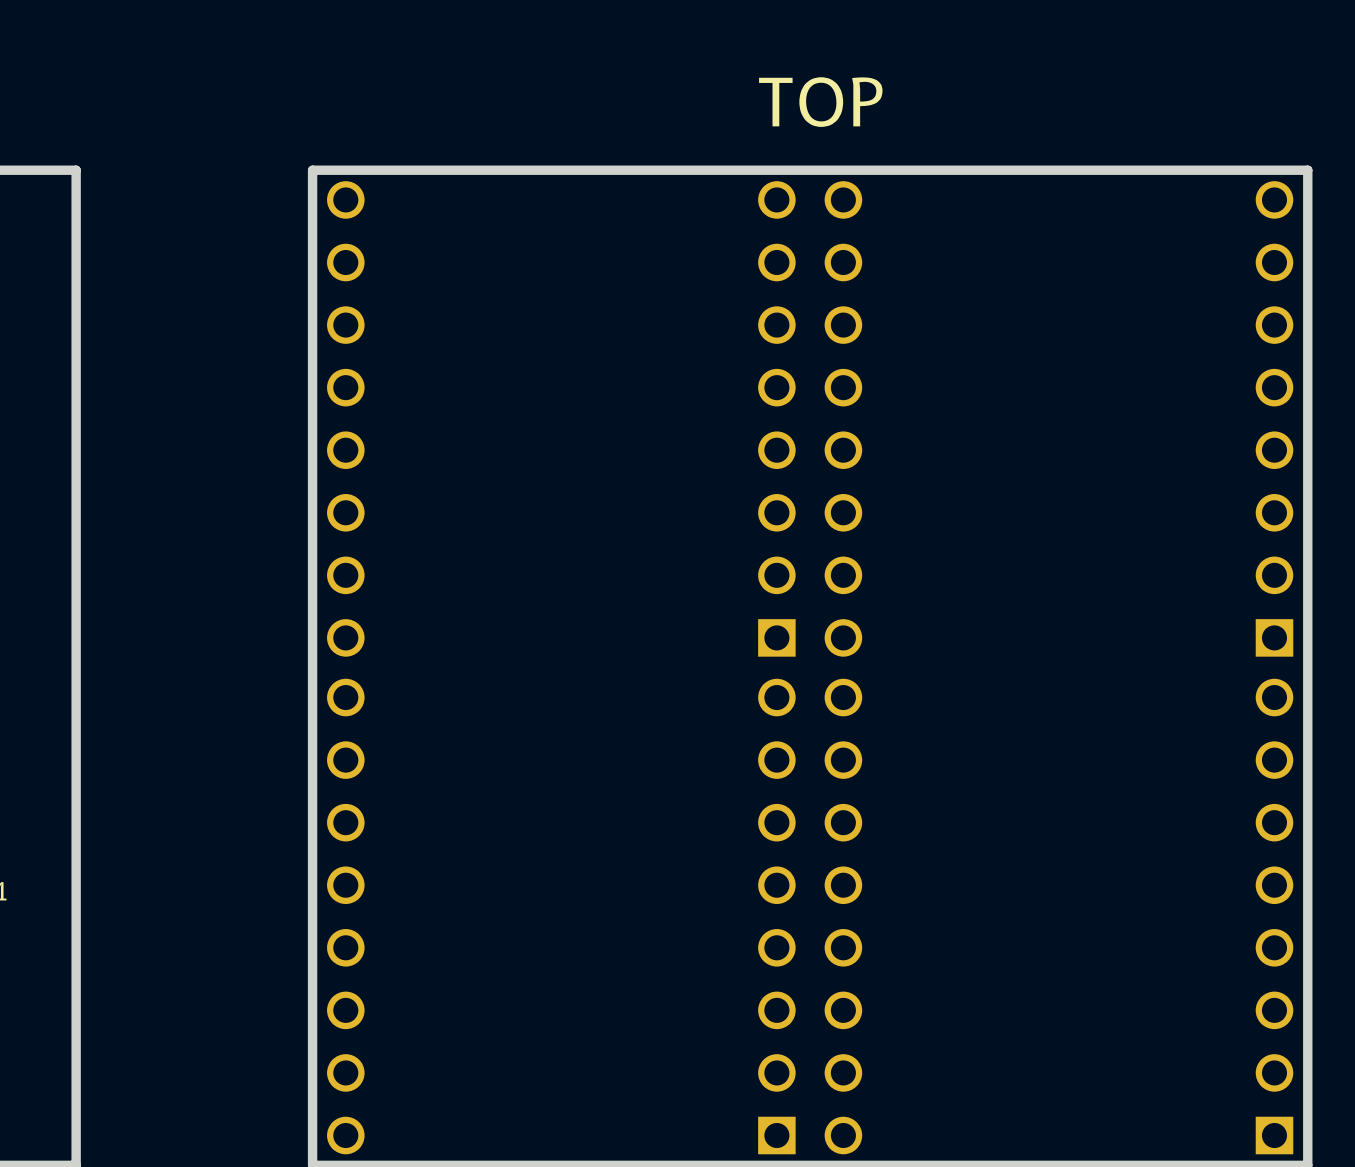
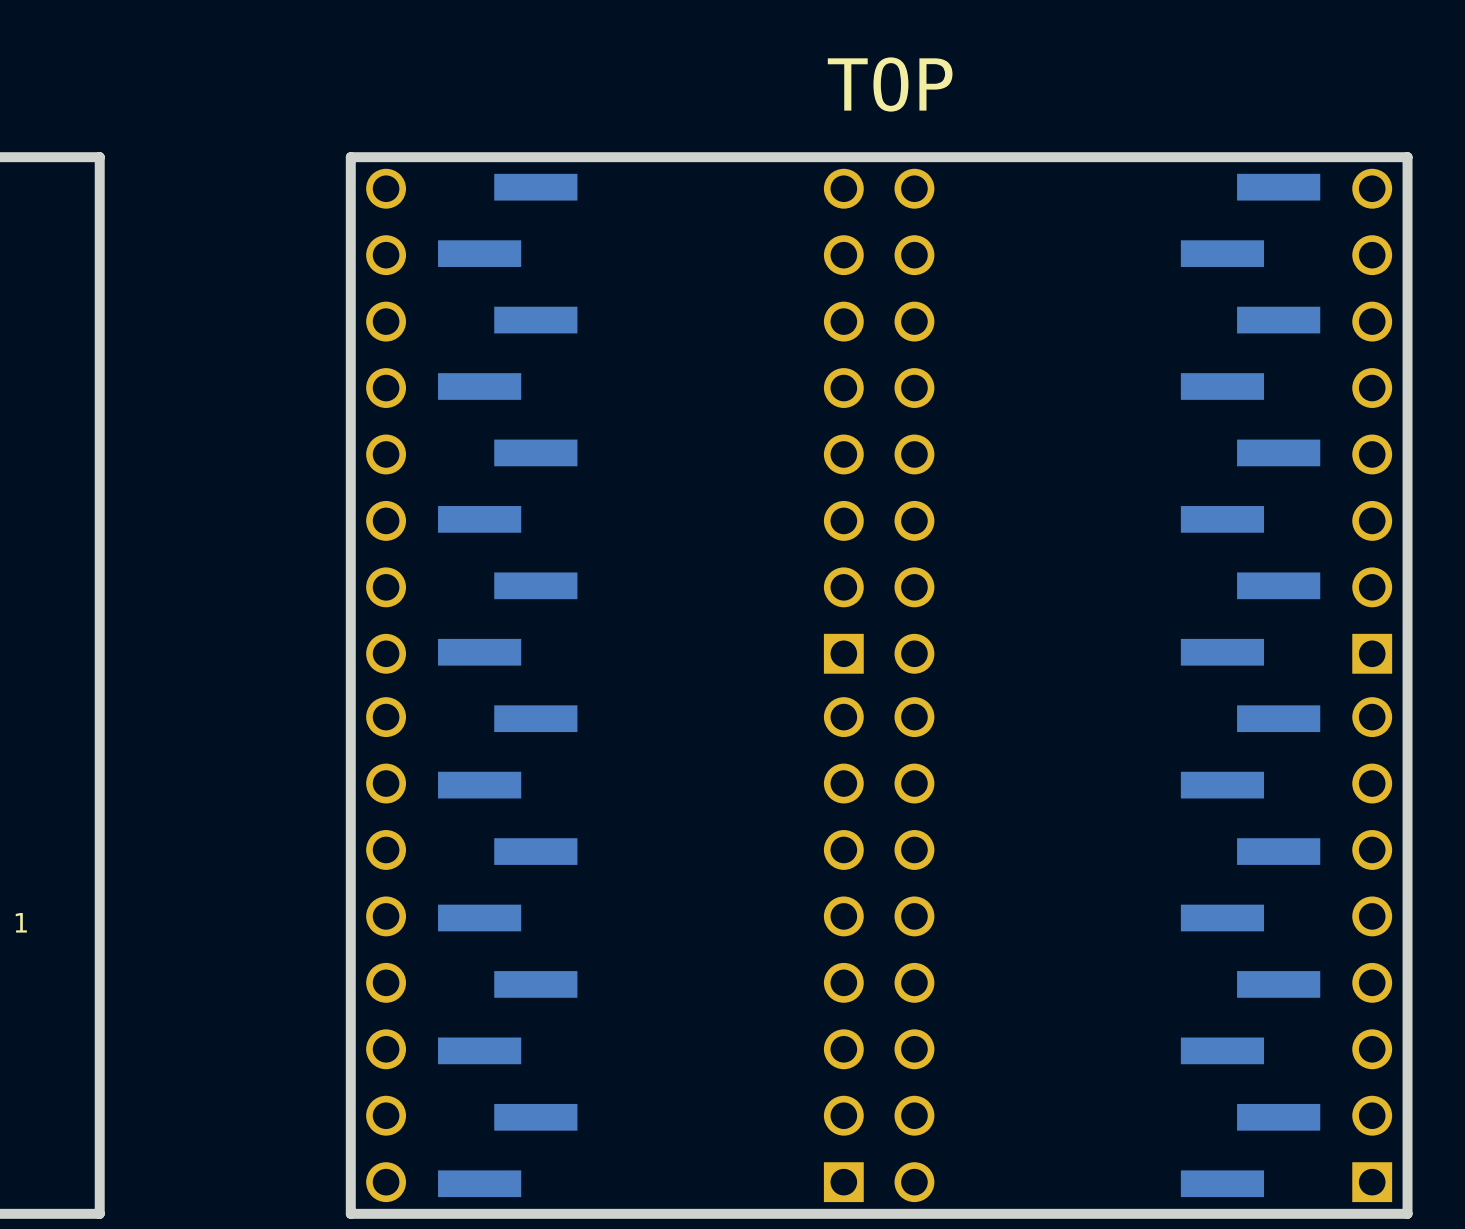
part: none -> (507, 685)
part: none -> (1250, 685)

